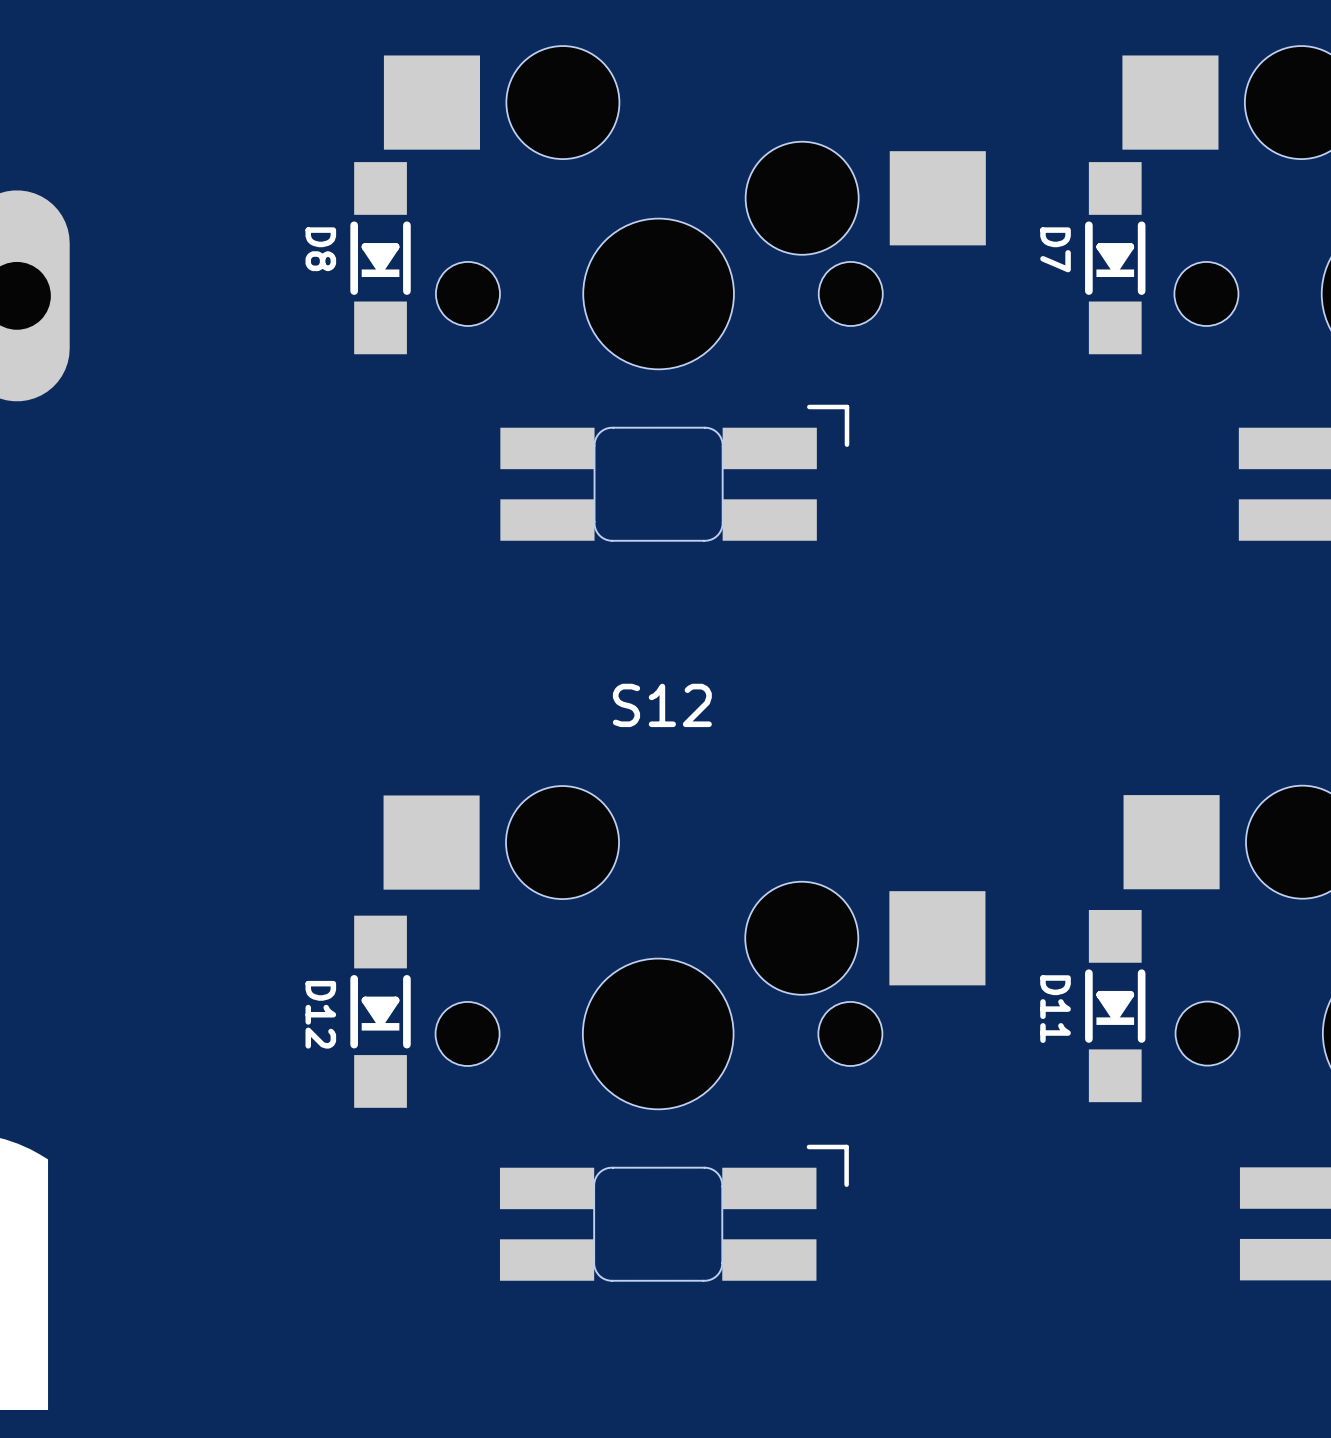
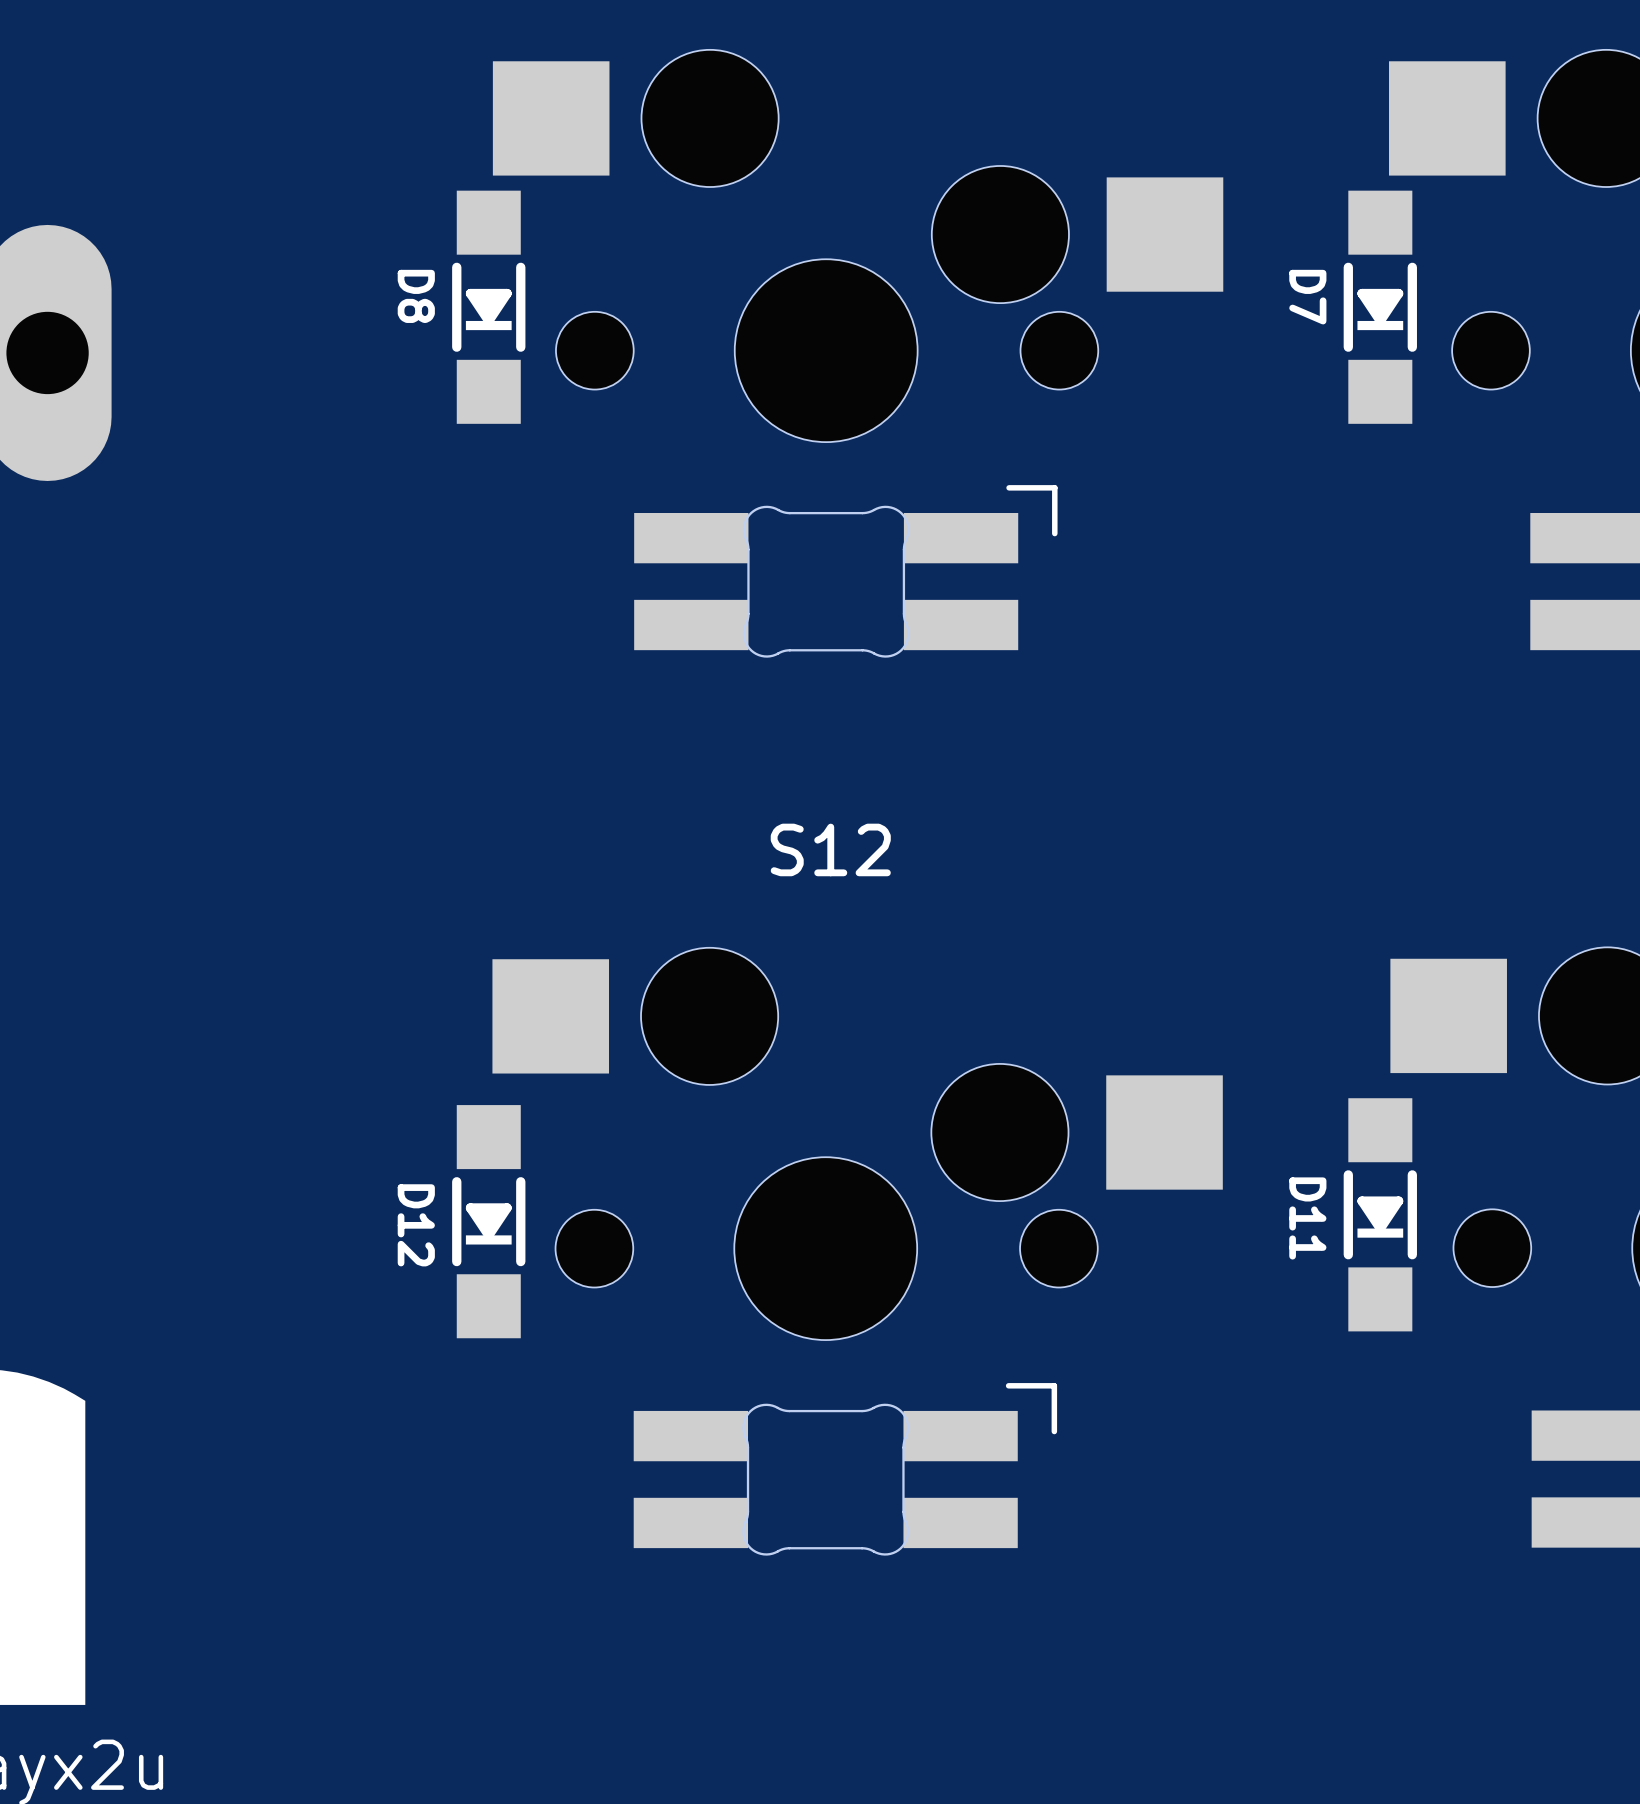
part footprint: [383, 46, 986, 542] -> [492, 49, 1224, 658]
part footprint: [383, 786, 986, 1282] -> [492, 947, 1223, 1556]

